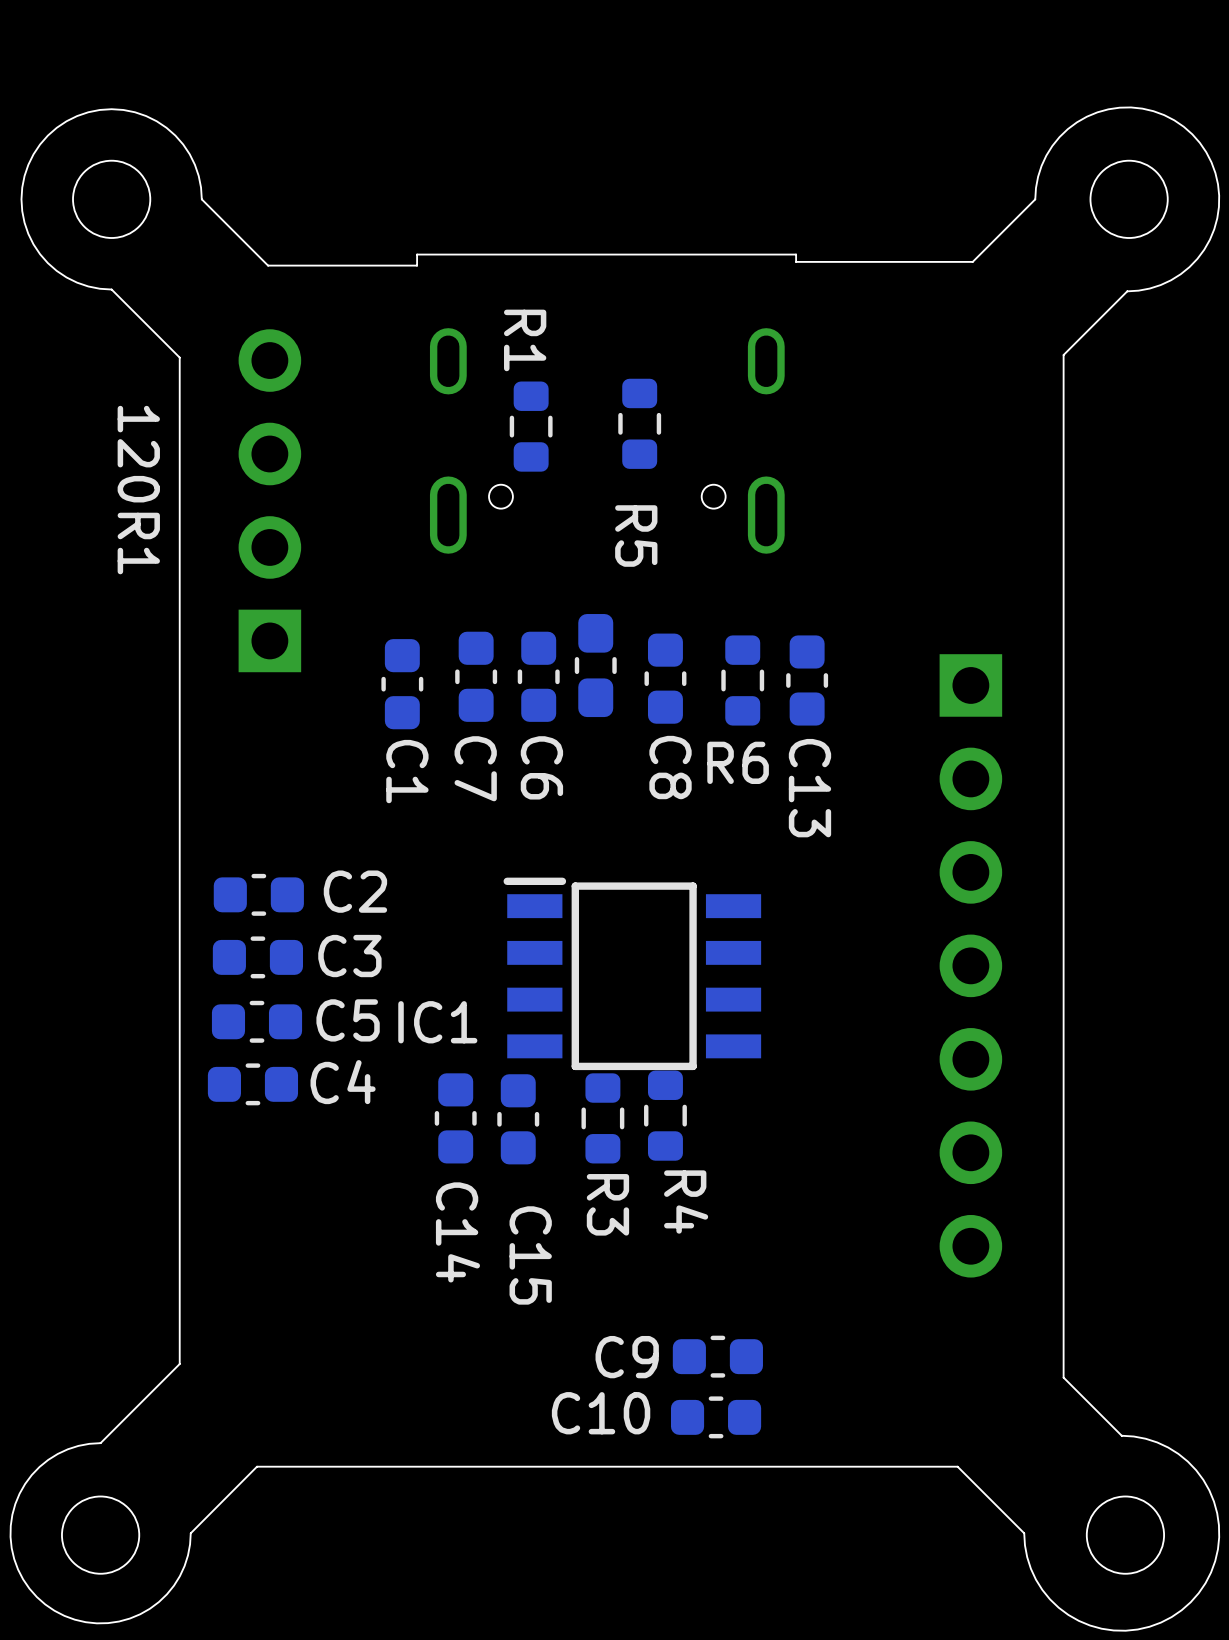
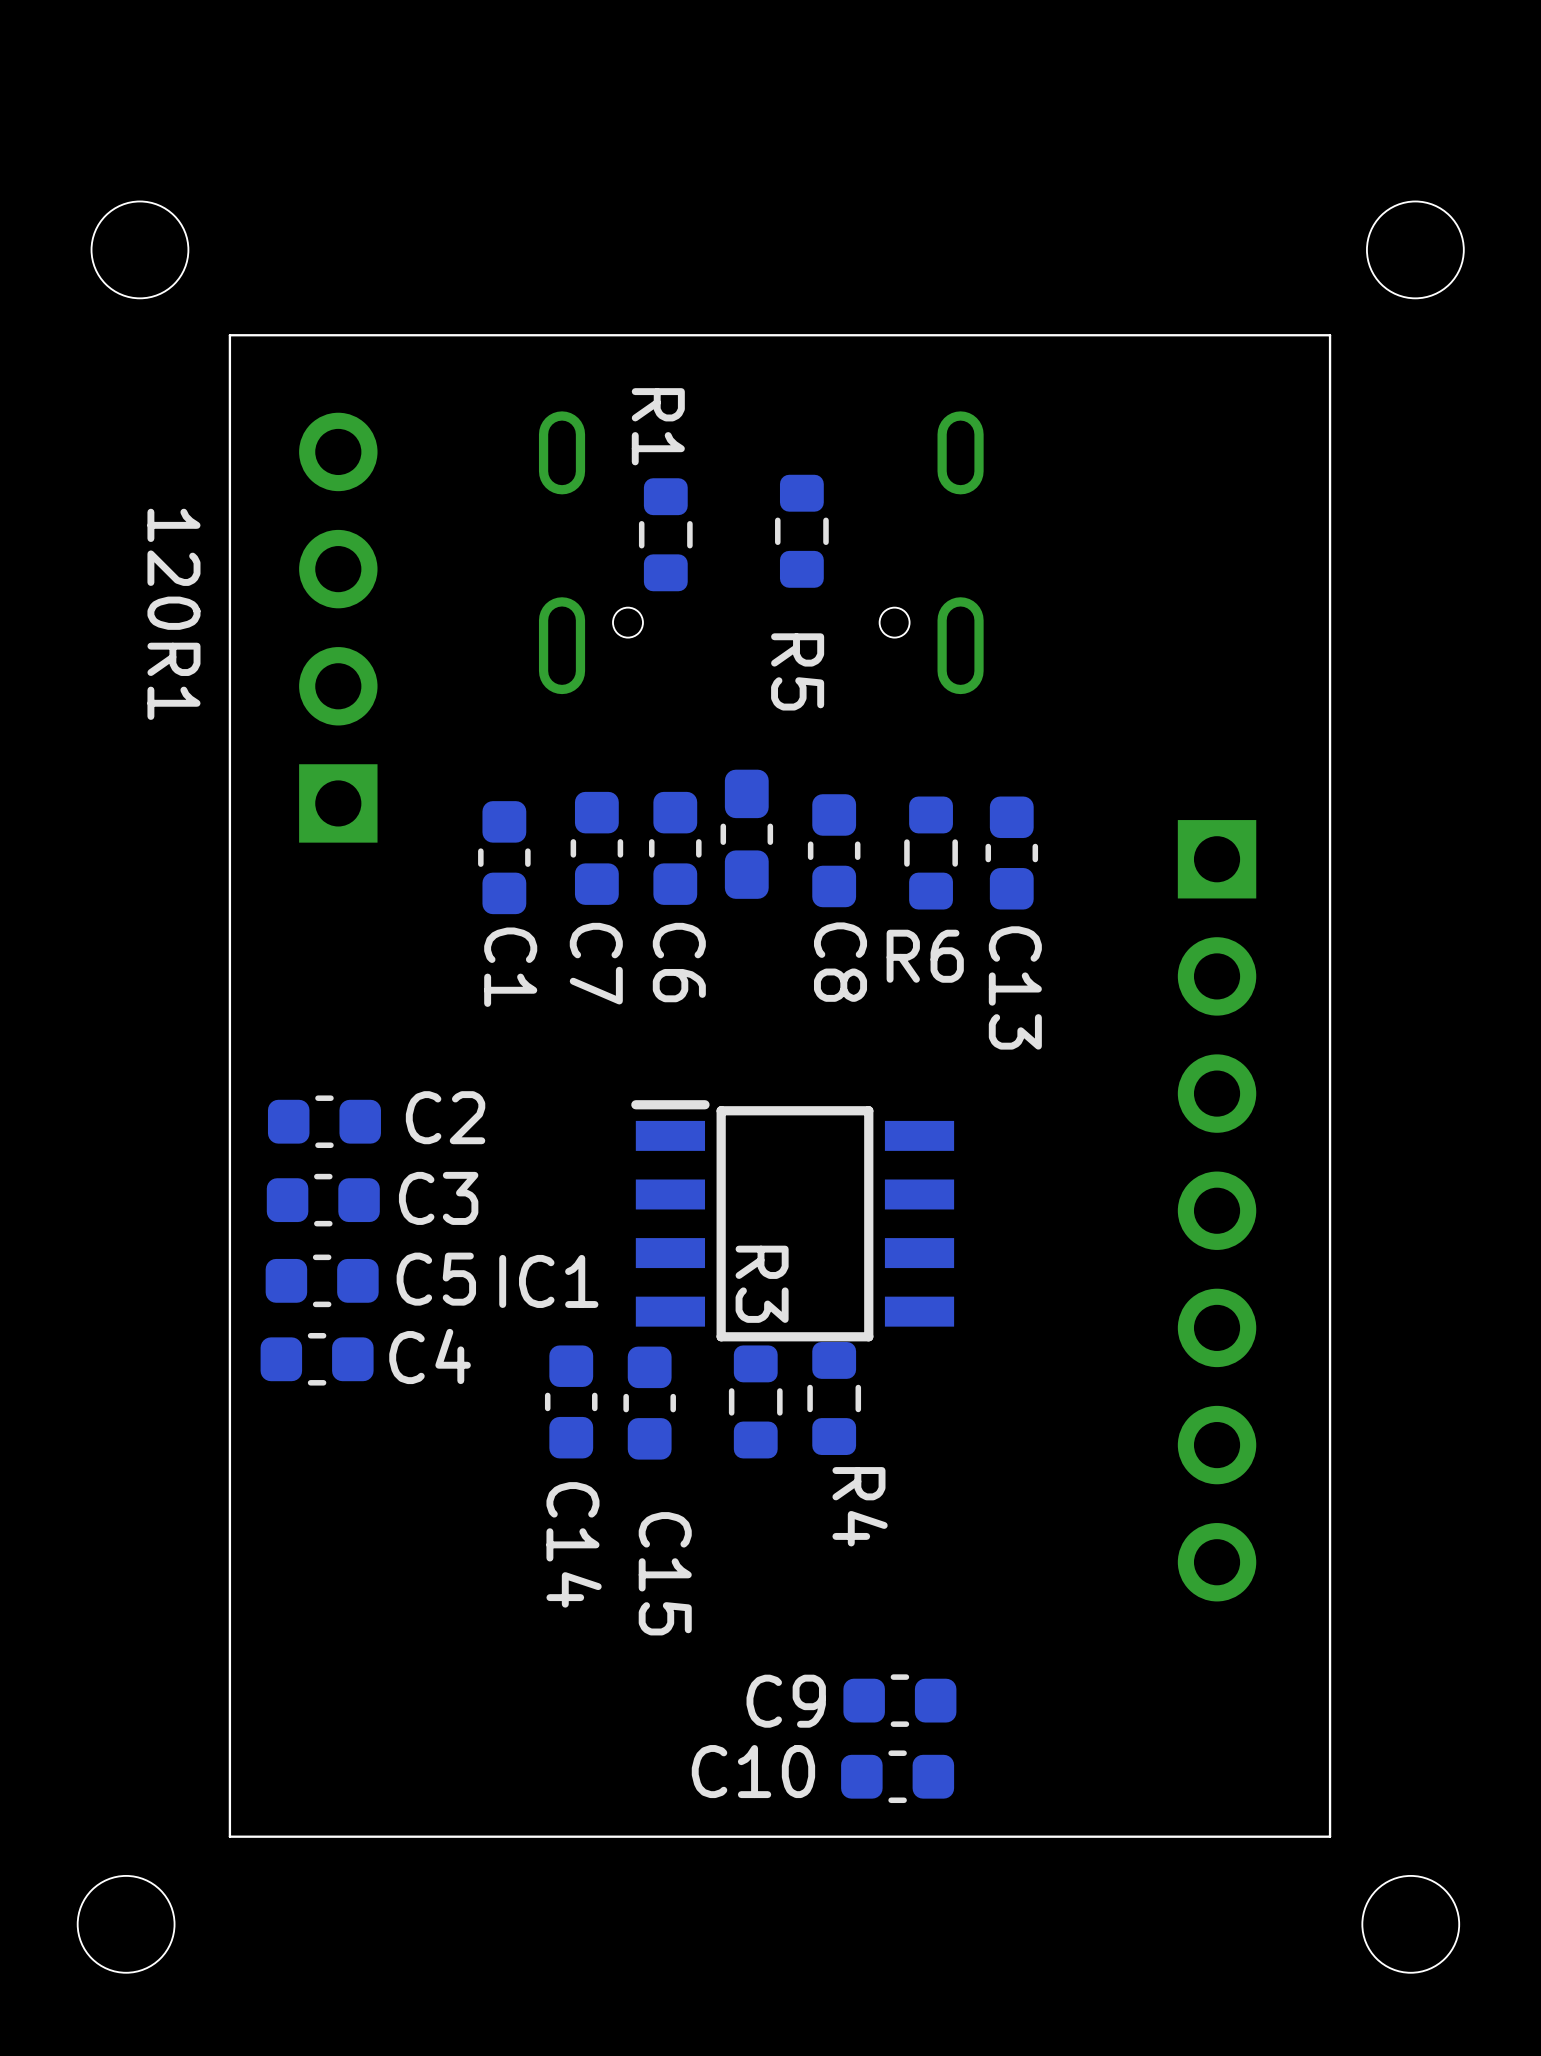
board edge: (1035, 199) (972, 261) (796, 261) (796, 254) (417, 254) (417, 265) (268, 265) (201, 199) (198, 176) (189, 154) (175, 135) (156, 121) (134, 112) (123, 109) (99, 109) (77, 116) (66, 121) (56, 127) (40, 144) (33, 154) (24, 176) (21, 199) (24, 222) (33, 244) (47, 263) (66, 277) (88, 286) (111, 289) (179, 357) (179, 1364) (100, 1443) (78, 1445) (48, 1459) (31, 1475) (19, 1493) (12, 1514) (11, 1548) (23, 1579) (45, 1604) (74, 1619) (96, 1623) (119, 1621) (149, 1608) (166, 1594) (179, 1576) (188, 1555) (190, 1533) (257, 1466) (957, 1466) (1024, 1533) (1027, 1557) (1035, 1579) (1050, 1599) (1078, 1620) (1101, 1628) (1137, 1629) (1171, 1617) (1198, 1593) (1211, 1572) (1219, 1537) (1214, 1501) (1203, 1479) (1187, 1461) (1168, 1447) (1145, 1438) (1121, 1435) (1063, 1377) (1063, 355) (1127, 291) (1149, 288) (1171, 280) (1197, 258) (1209, 239) (1217, 218) (1218, 184) (1206, 152) (1183, 126) (1153, 111) (1119, 107) (1086, 116) (1059, 137) (1041, 165) (1035, 199) -> (1330, 335) (1330, 1836) (229, 1836) (229, 335) (1330, 335)
R3 name position: R3 (607, 1204) -> R3 (762, 1284)

